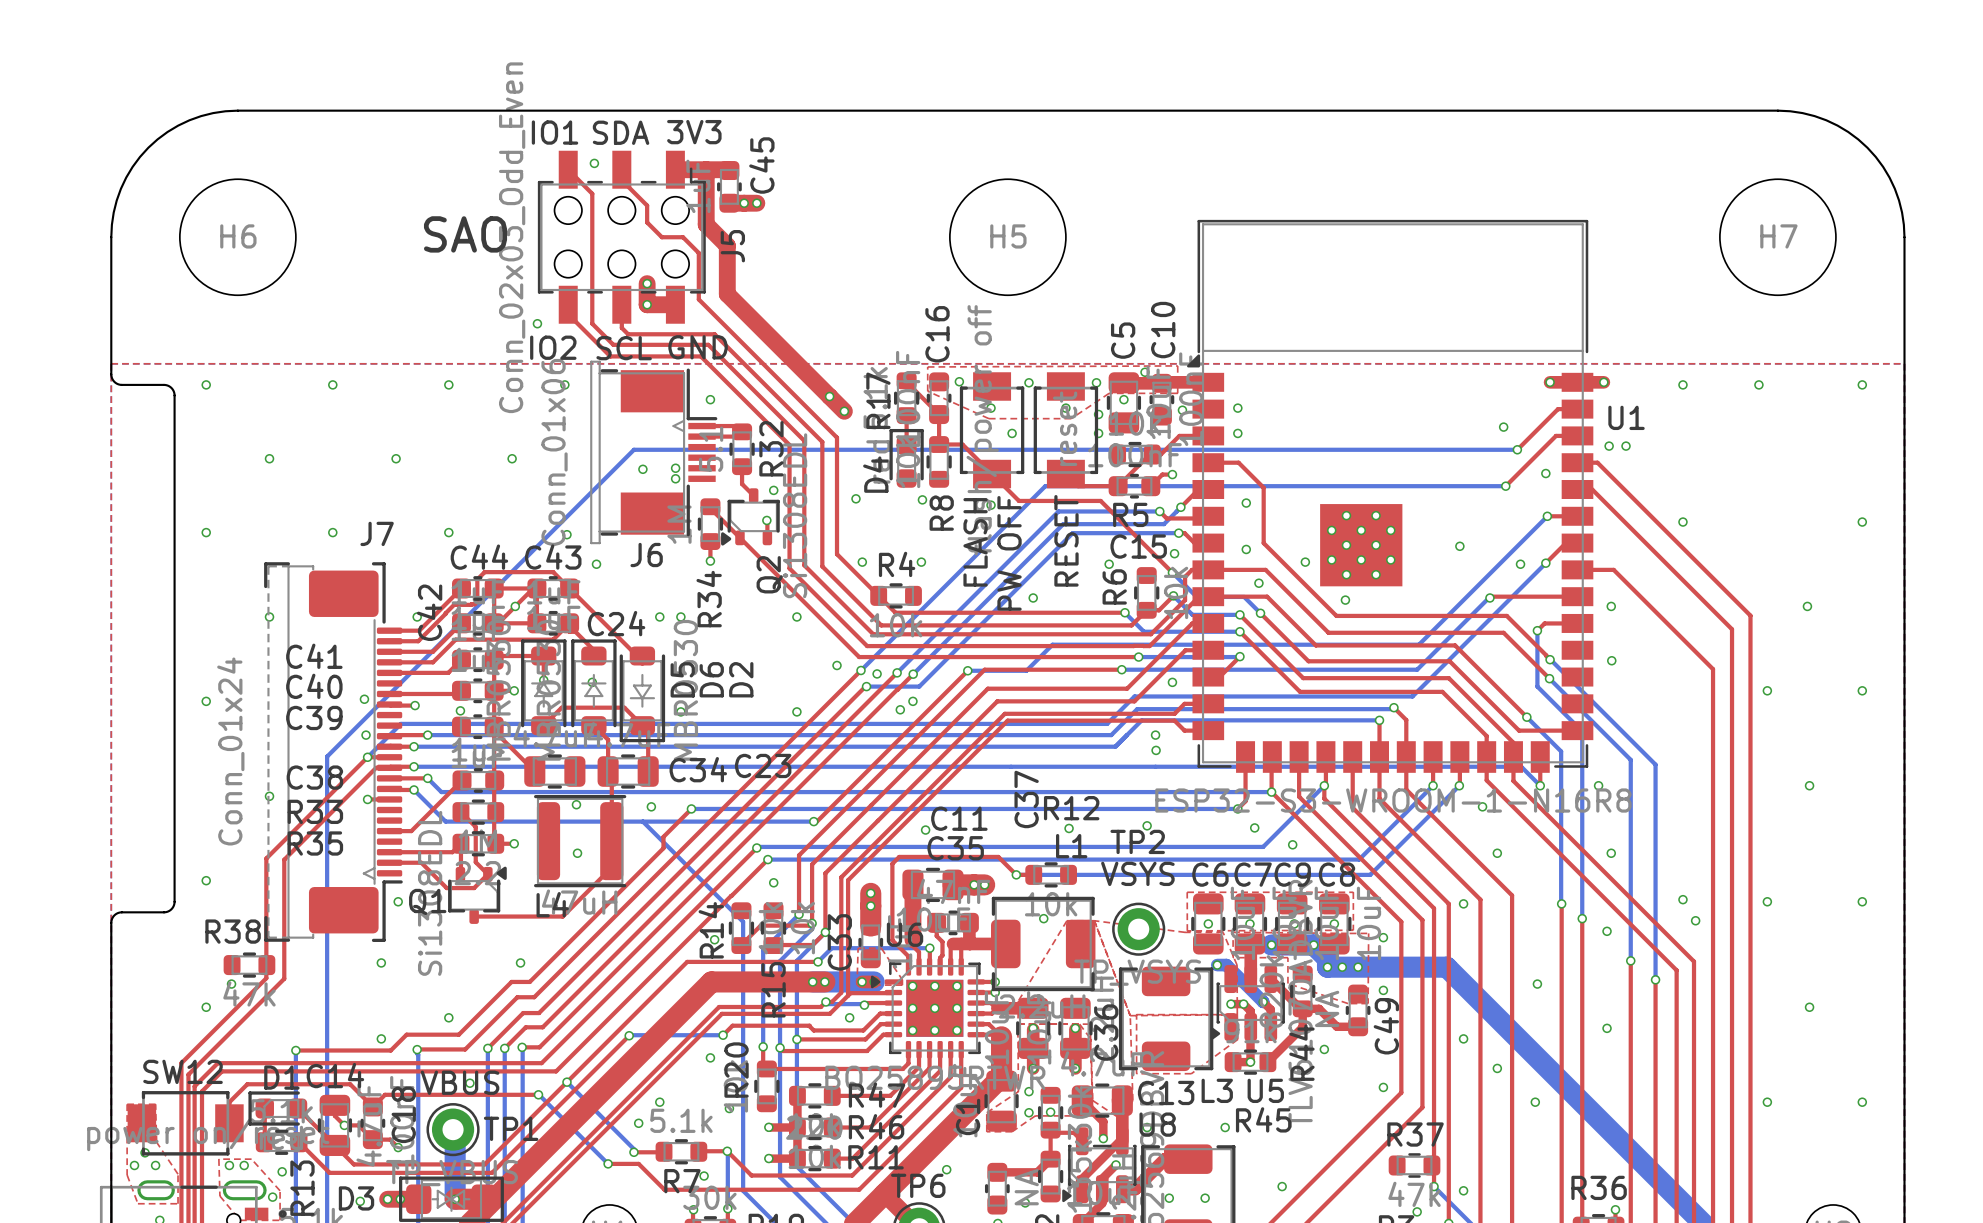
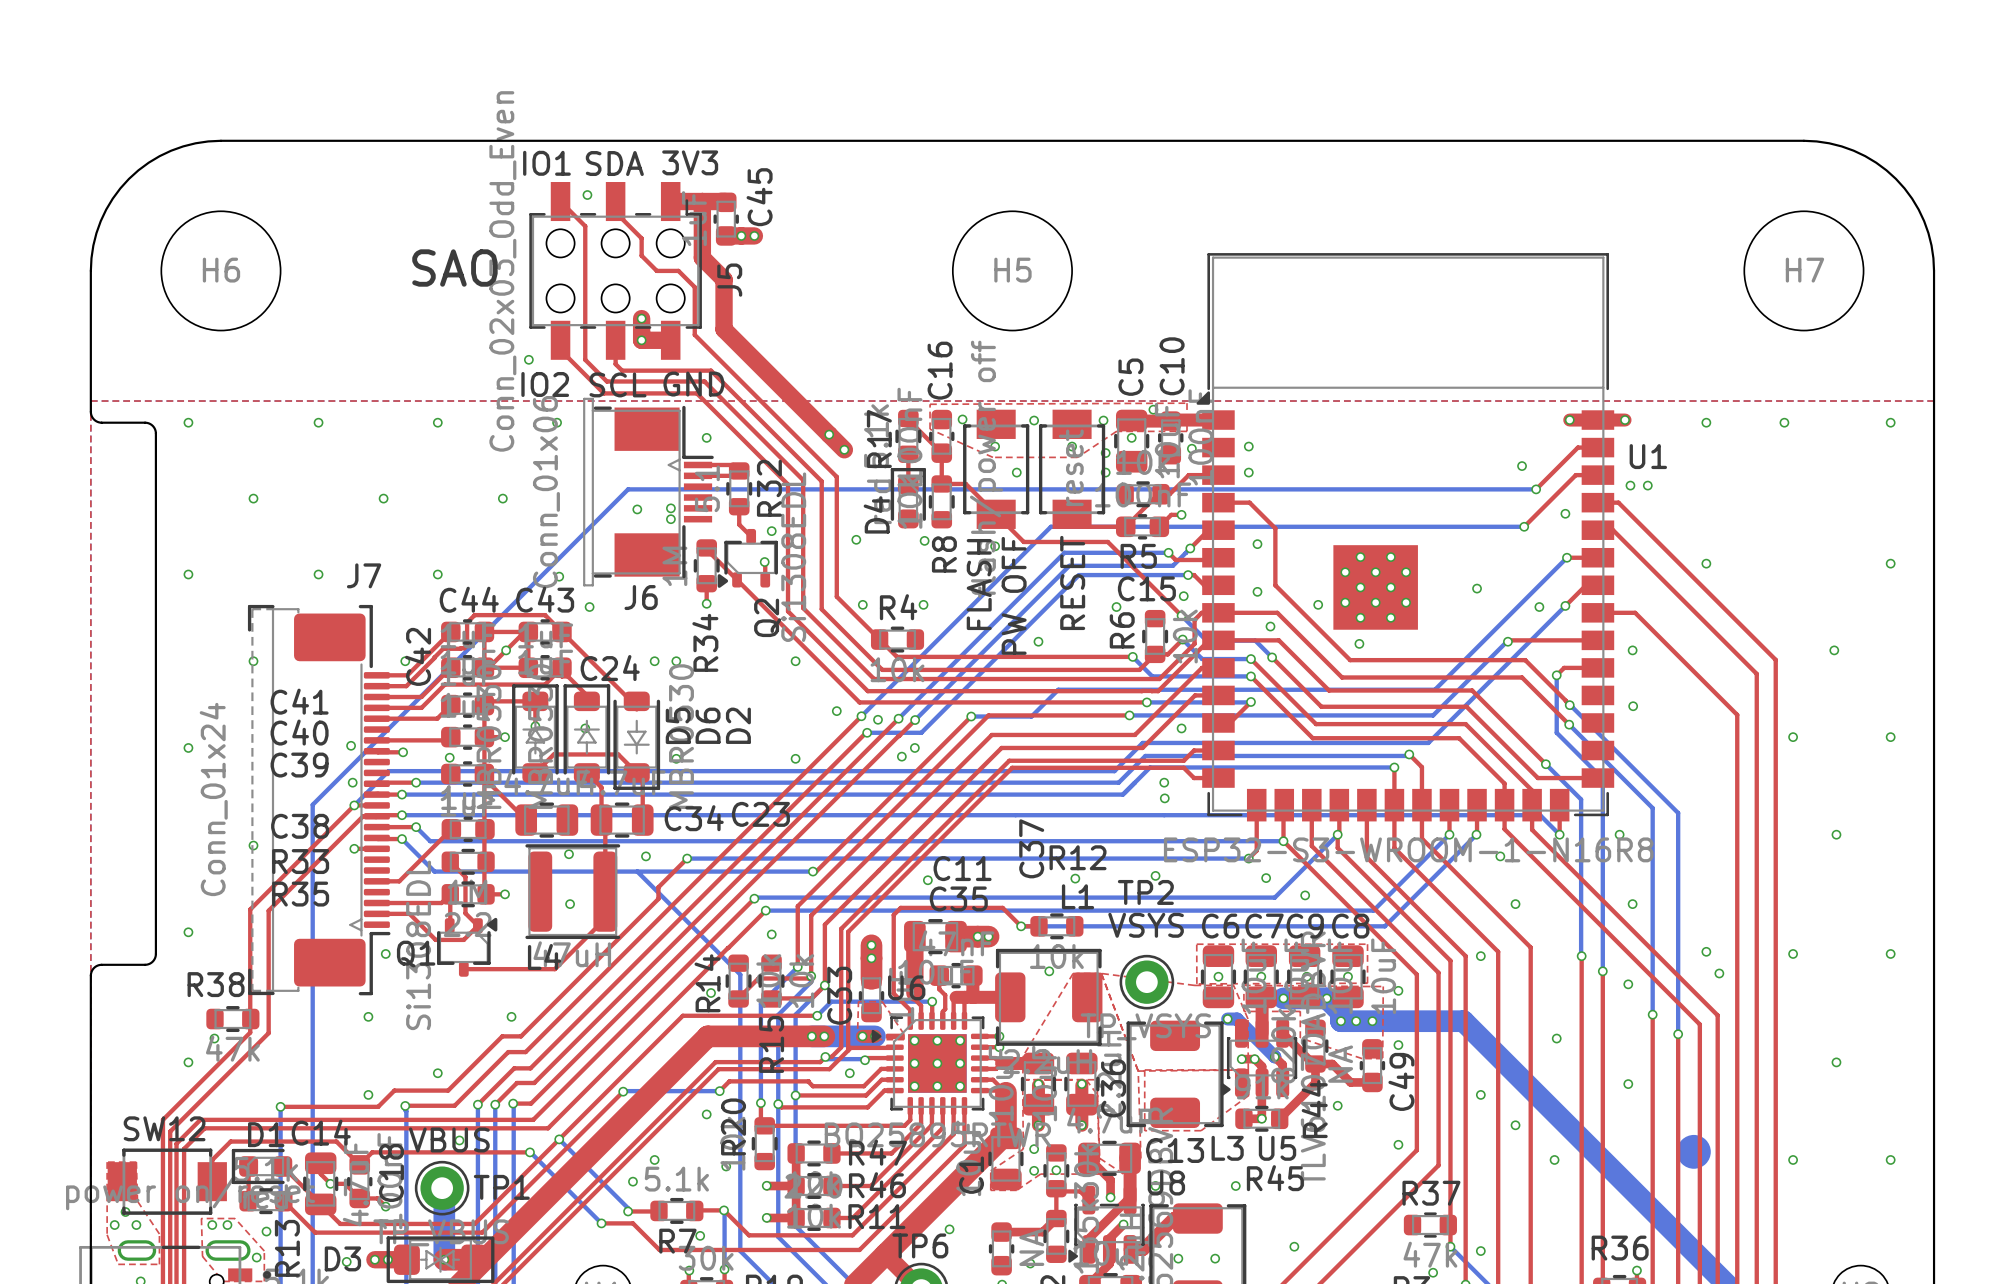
drawing: none -> [1676, 1134, 1711, 1169]

